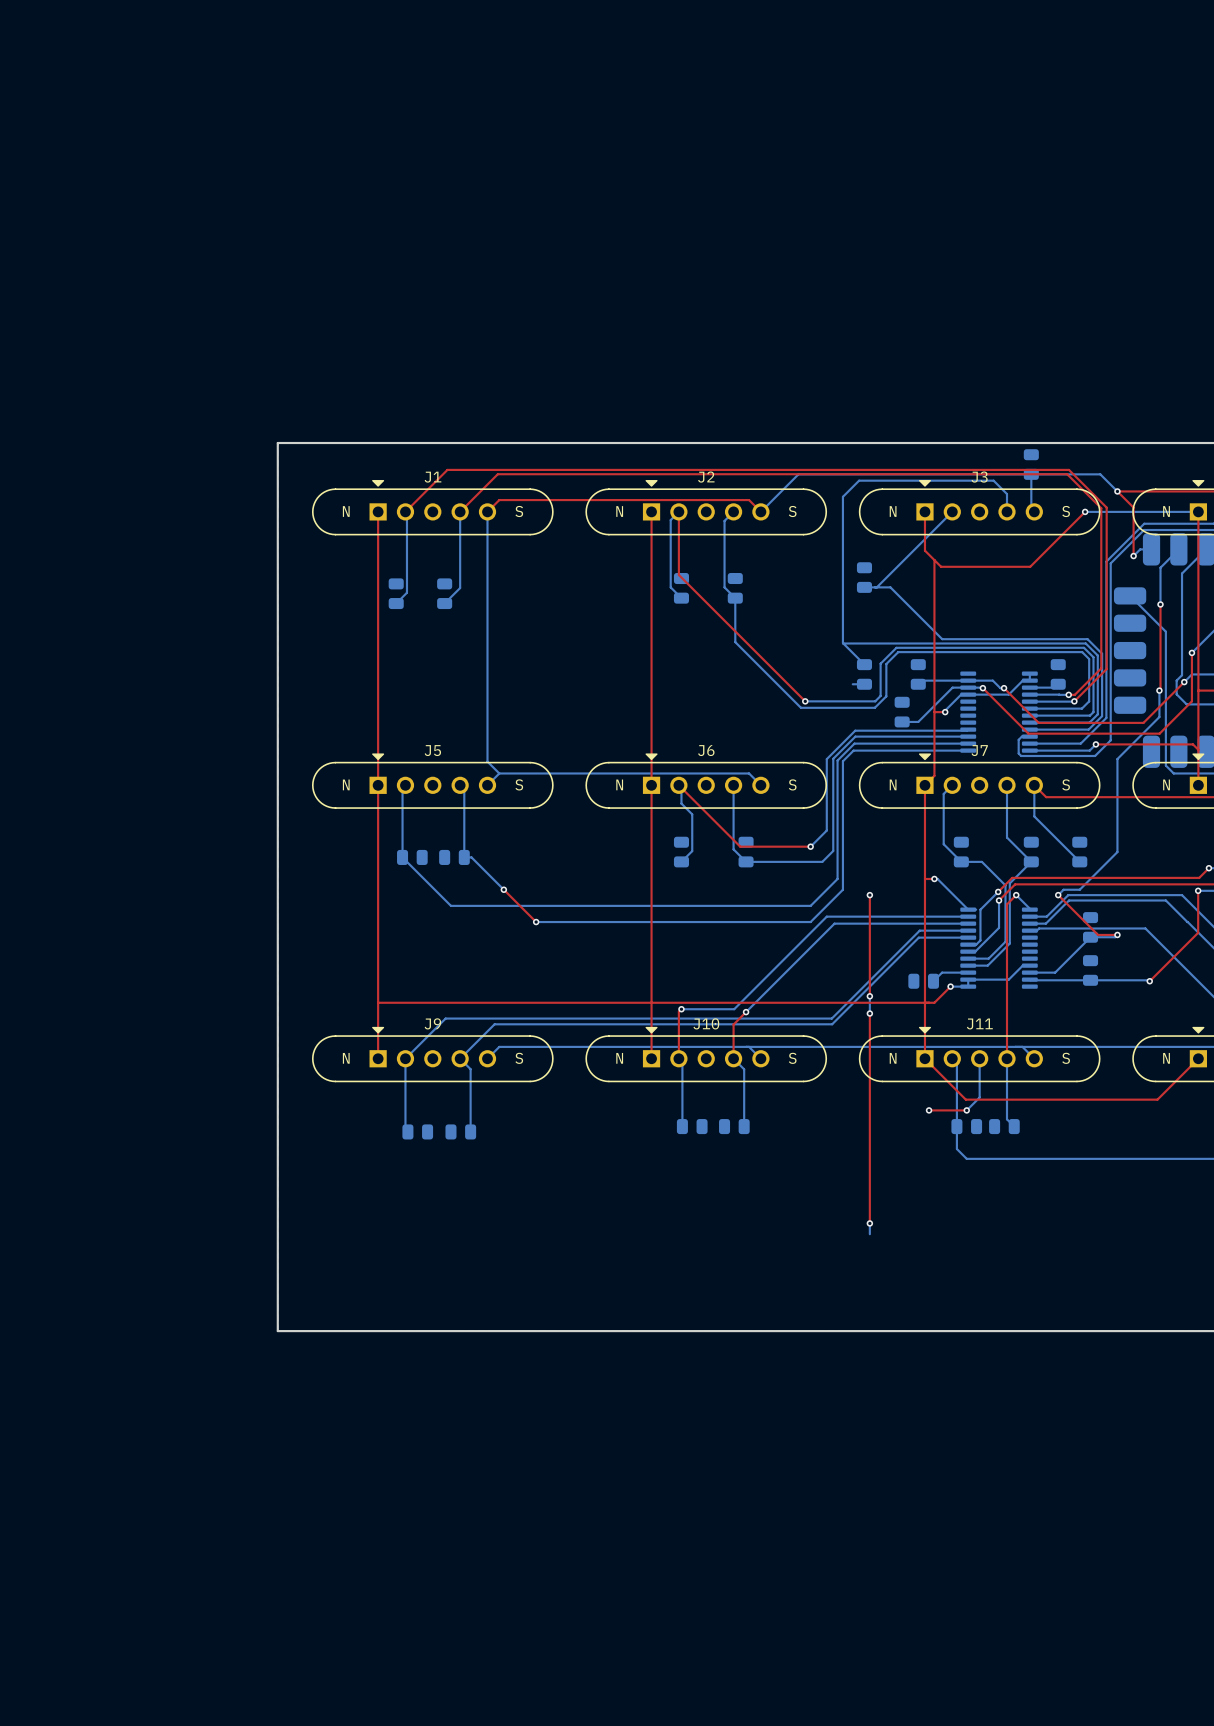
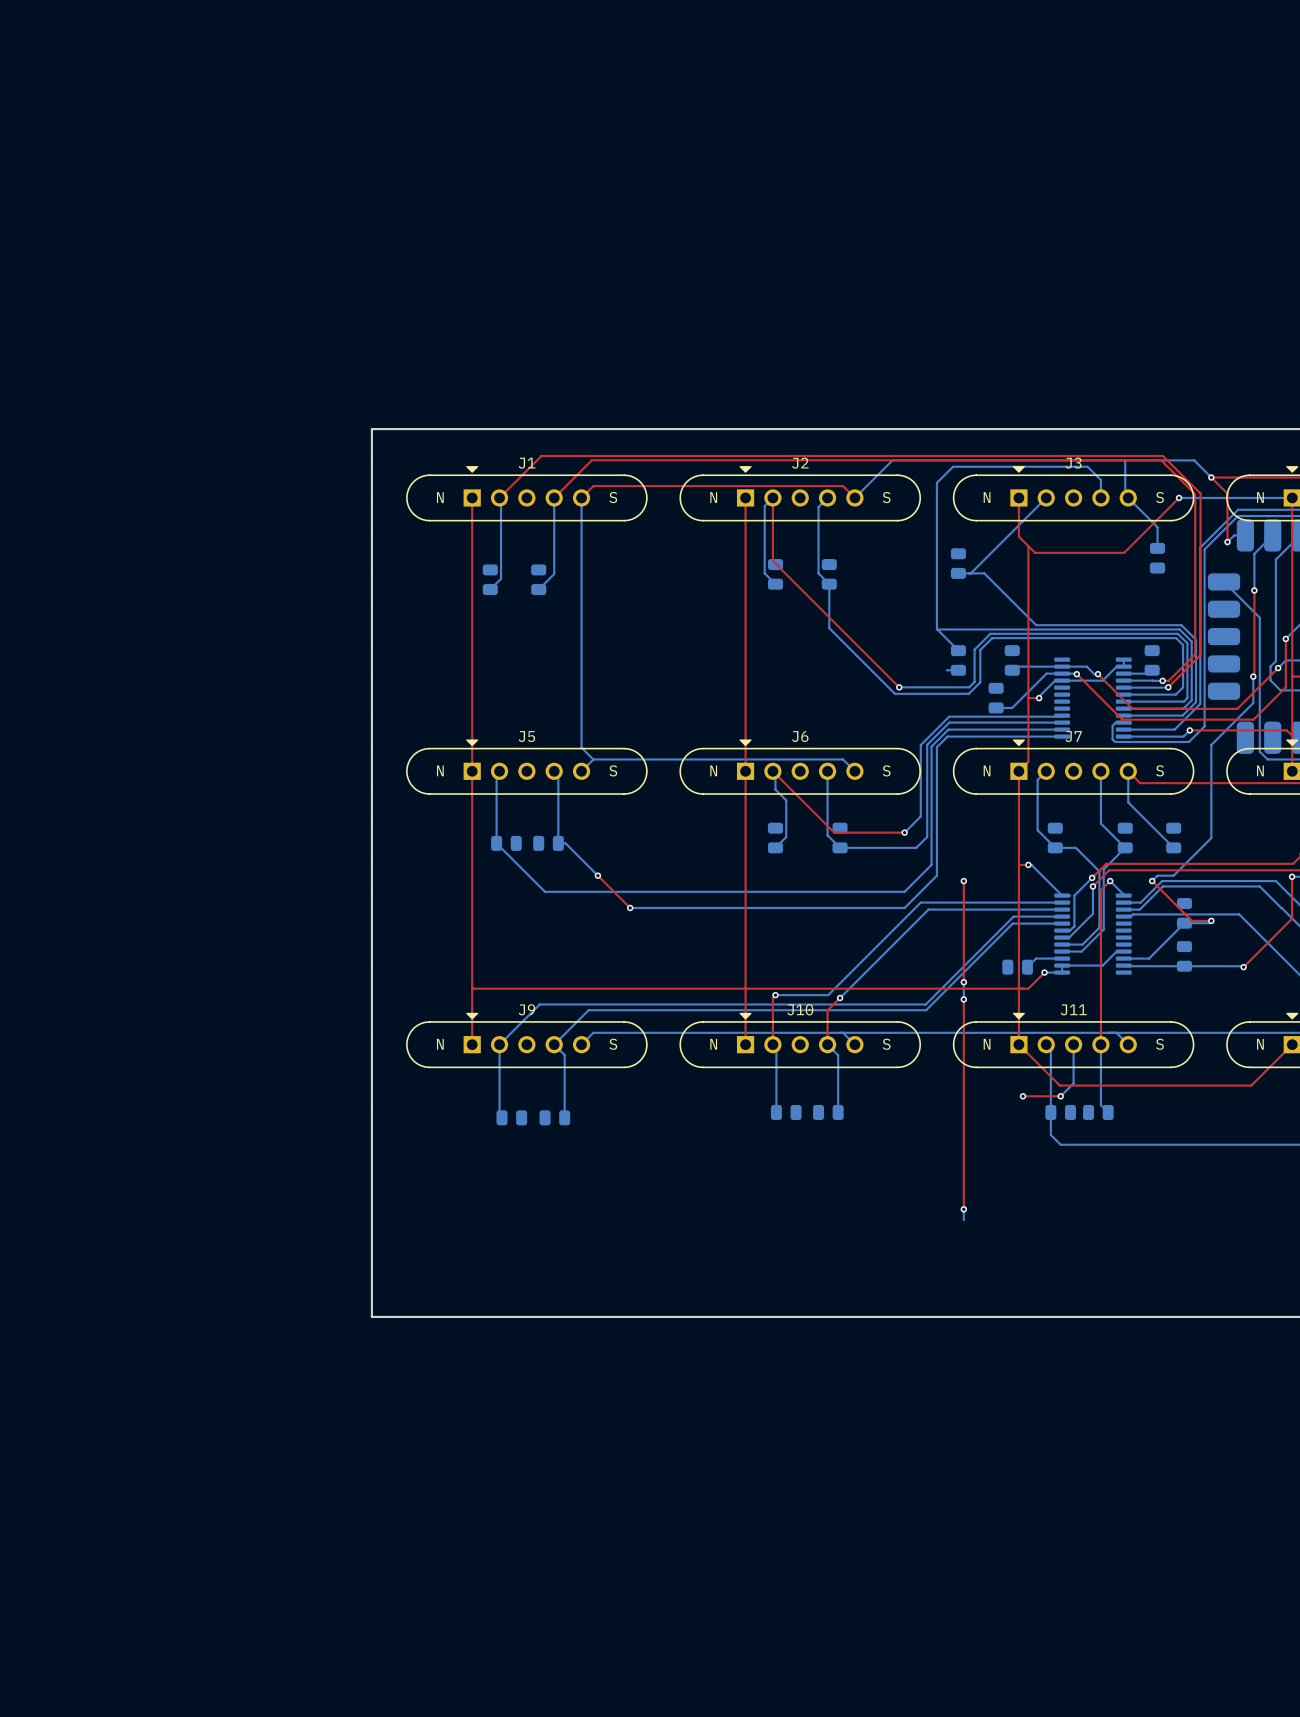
part position: (1031, 464) -> (1157, 558)
bottom track: none -> (1128, 497) (1157, 527) (1157, 548)

